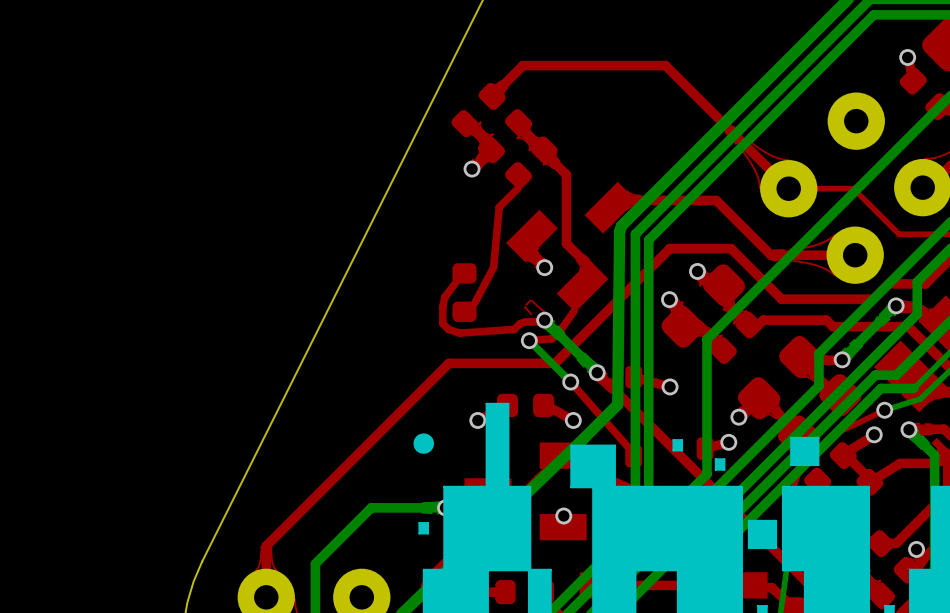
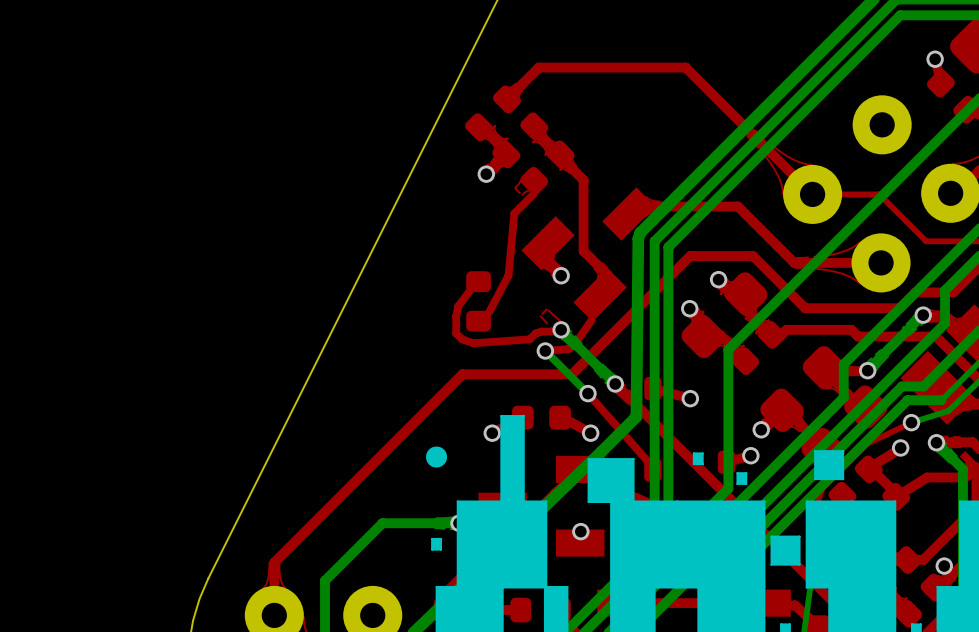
top zone outline: none -> (520, 179) (532, 191) (528, 190) (521, 195) (514, 188) (520, 181)

